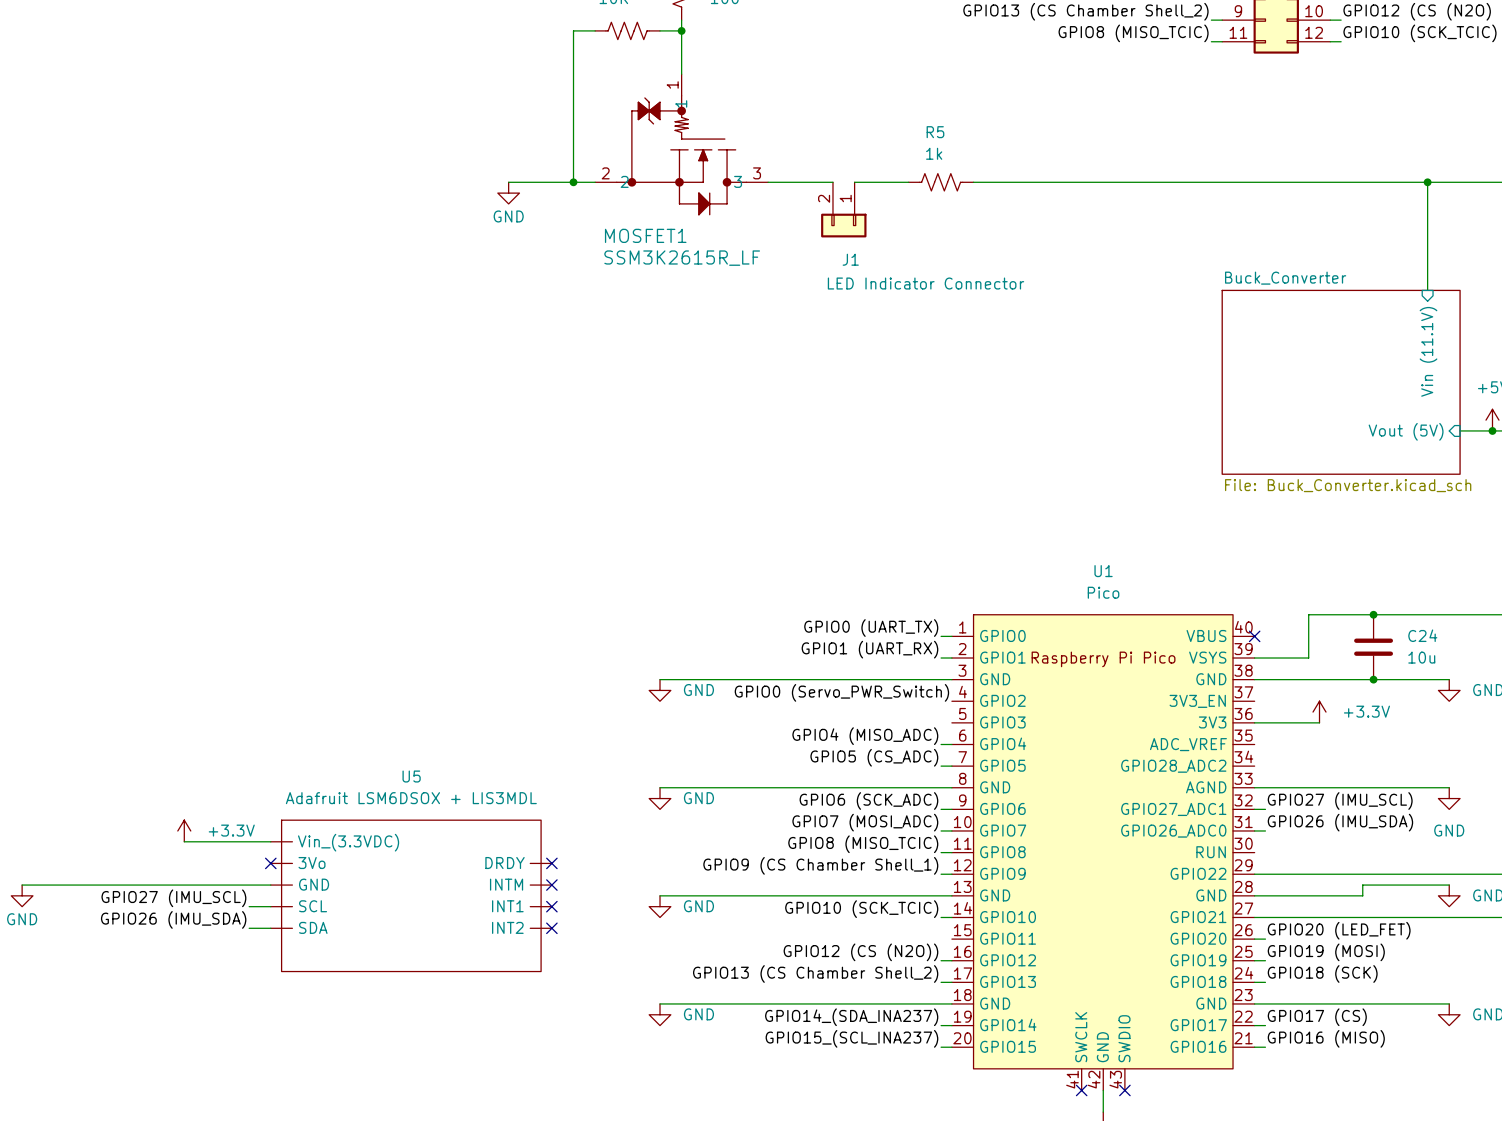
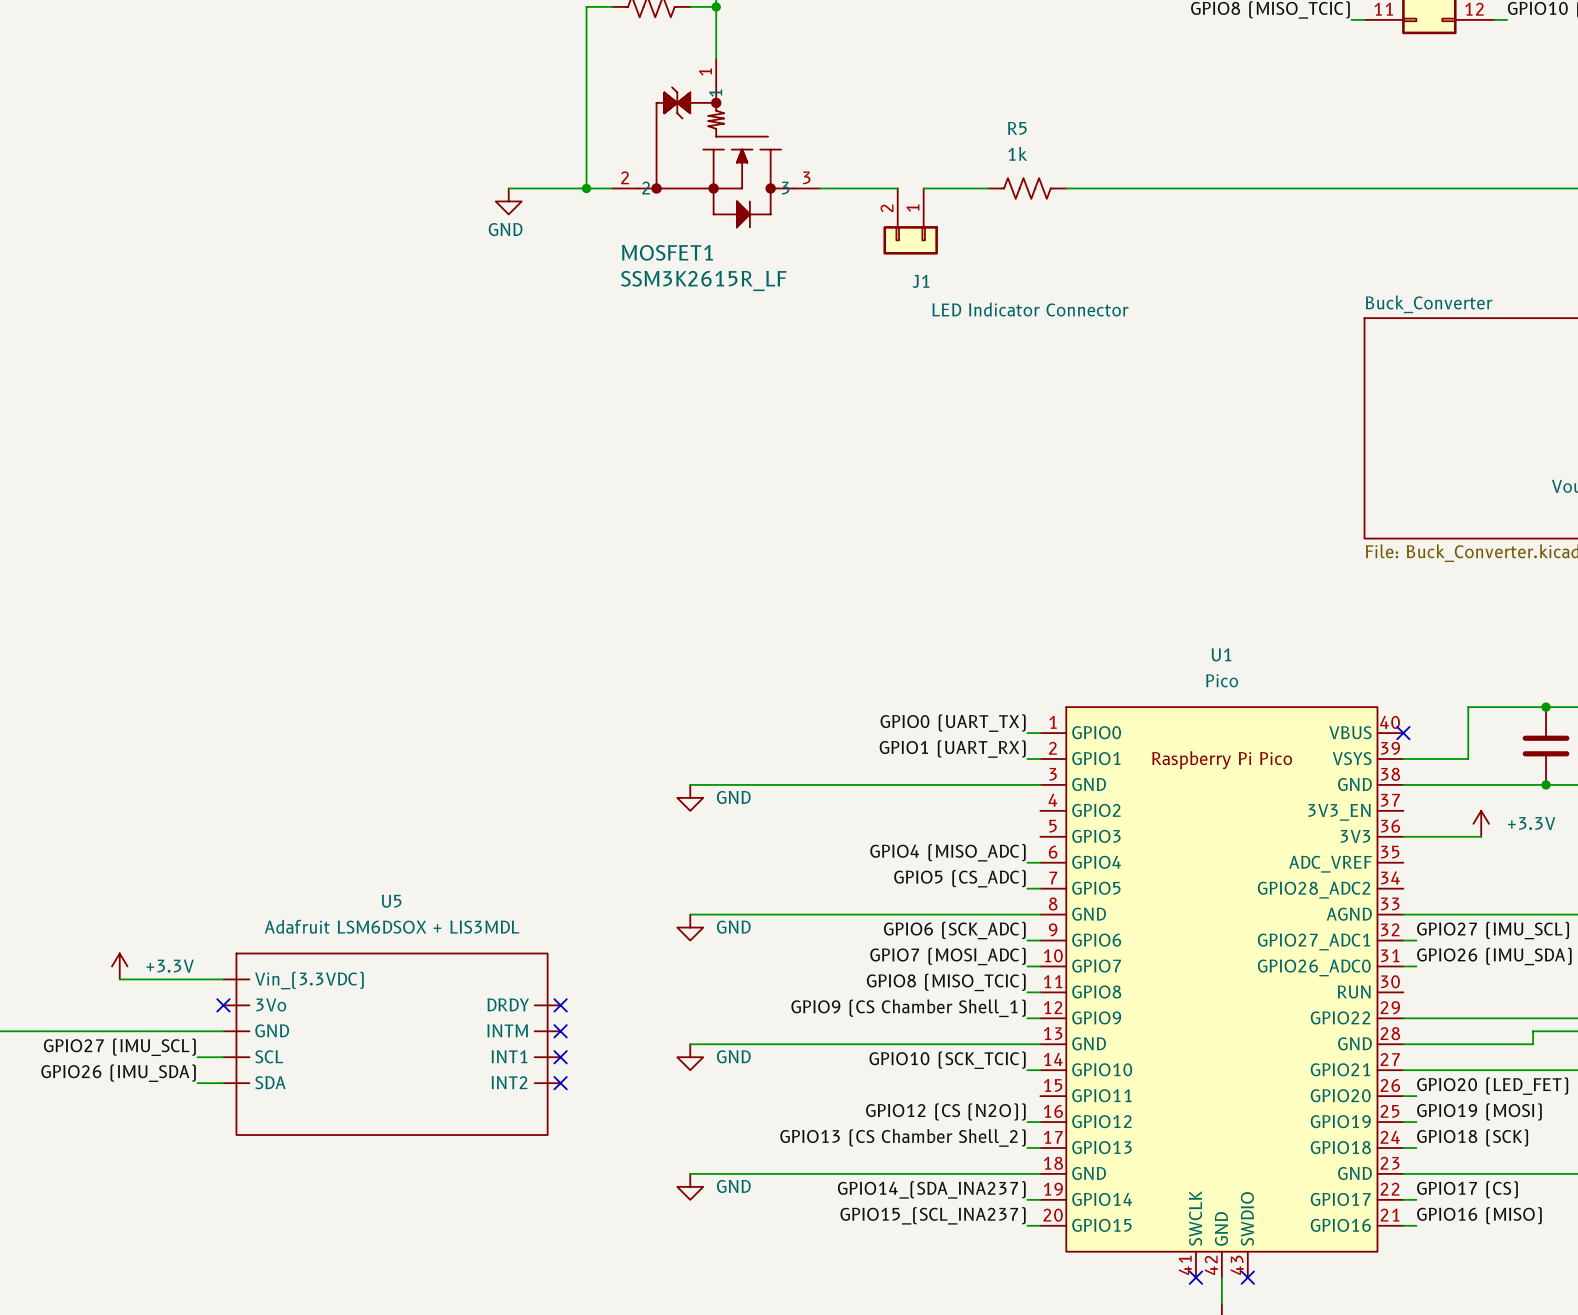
label: GPIO0 (Servo_PWR_Switch) (841, 692) -> none

